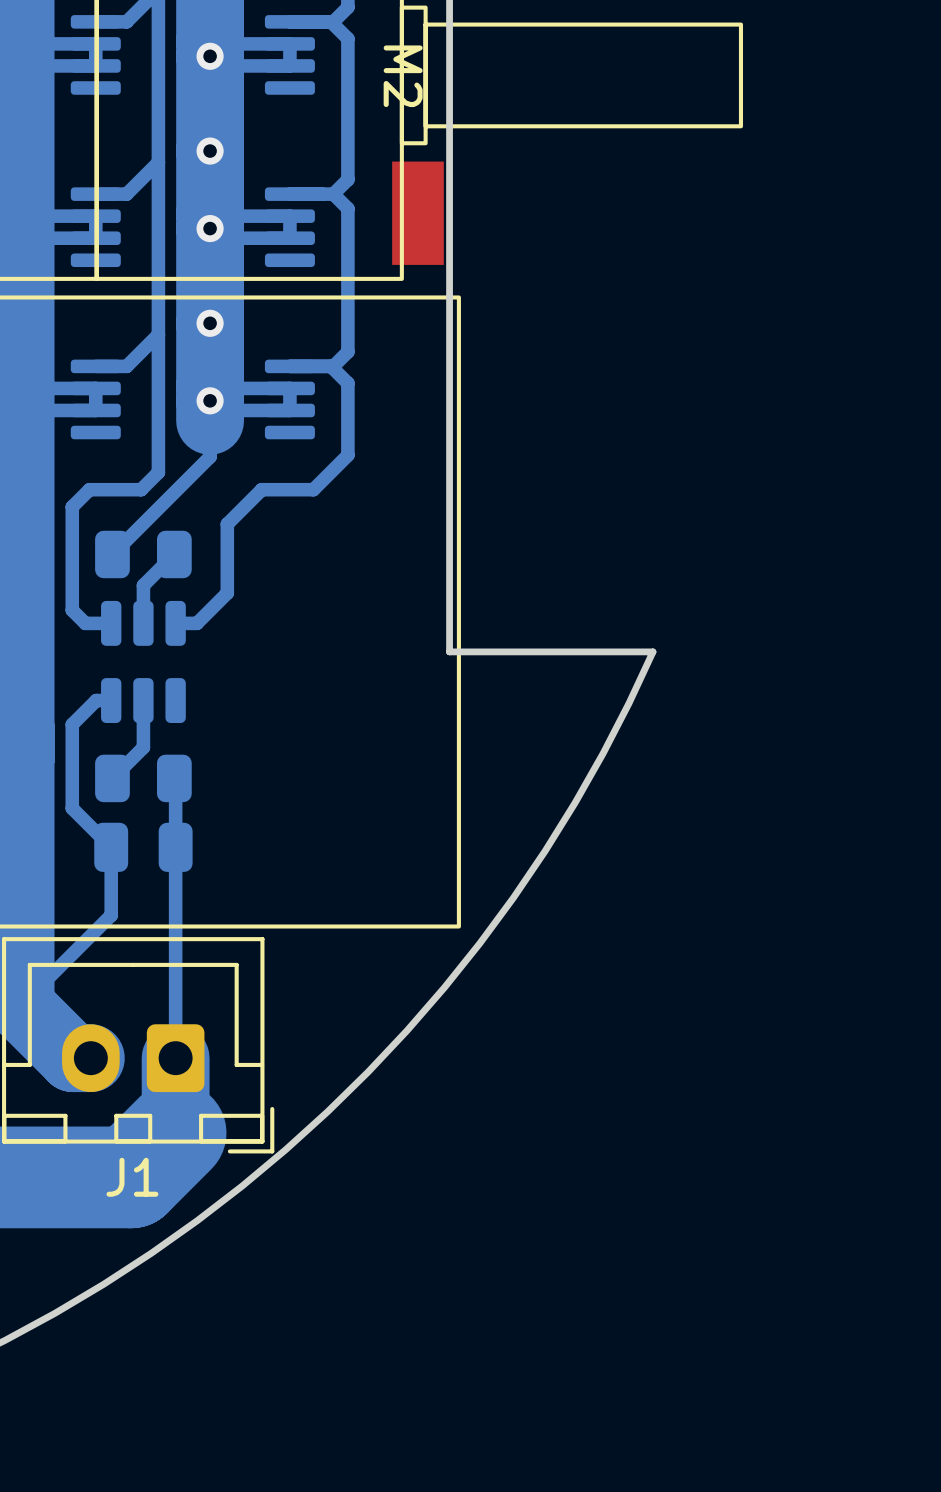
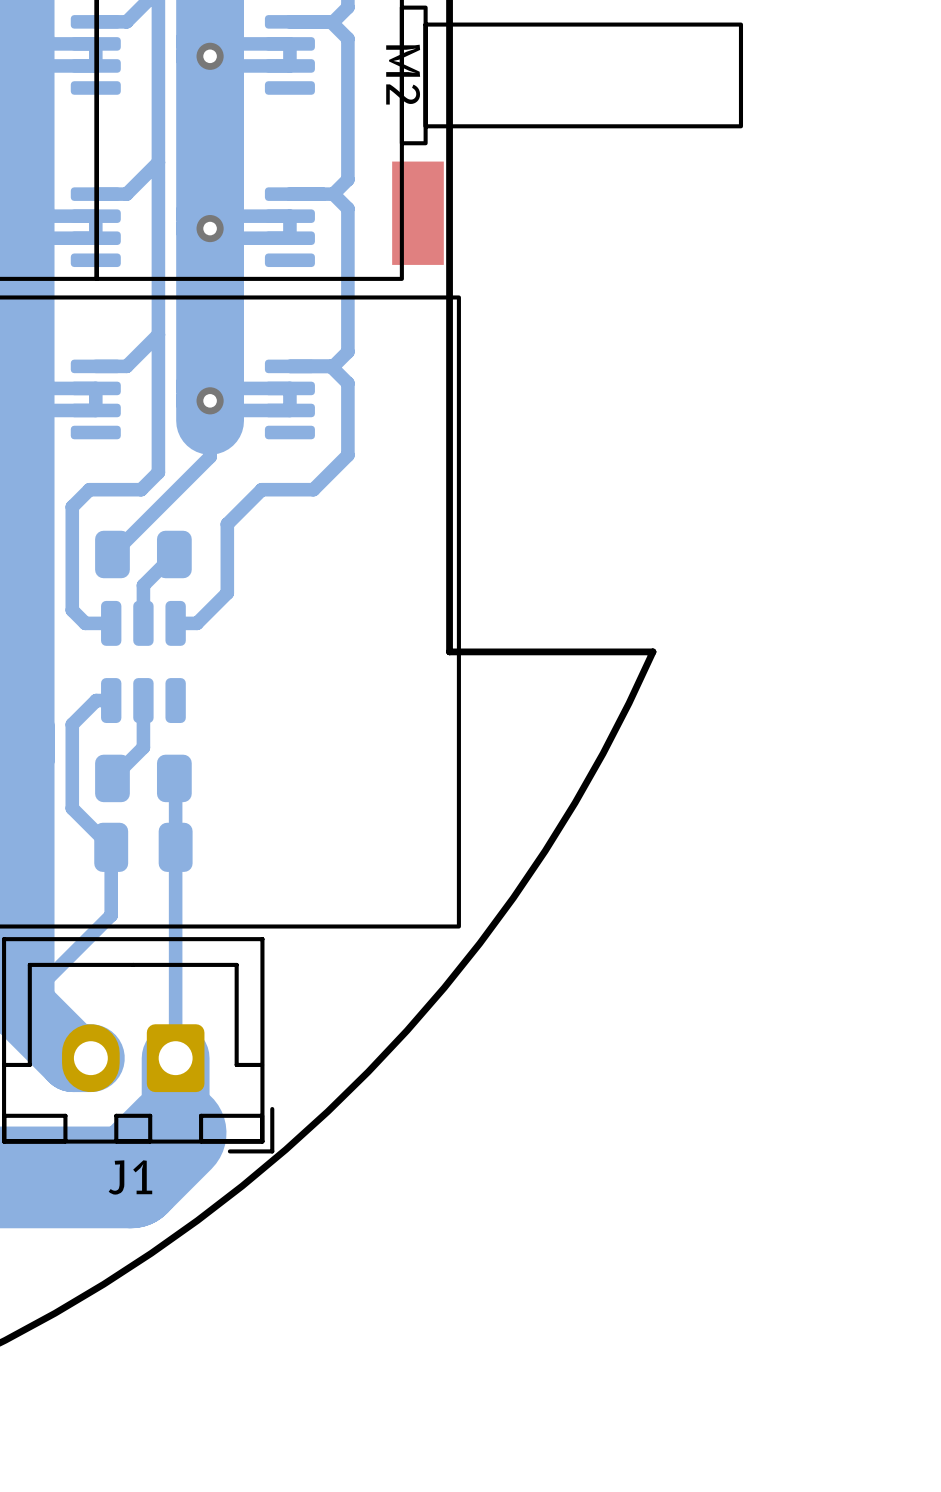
via: (210, 151) -> none
via: (210, 323) -> none

